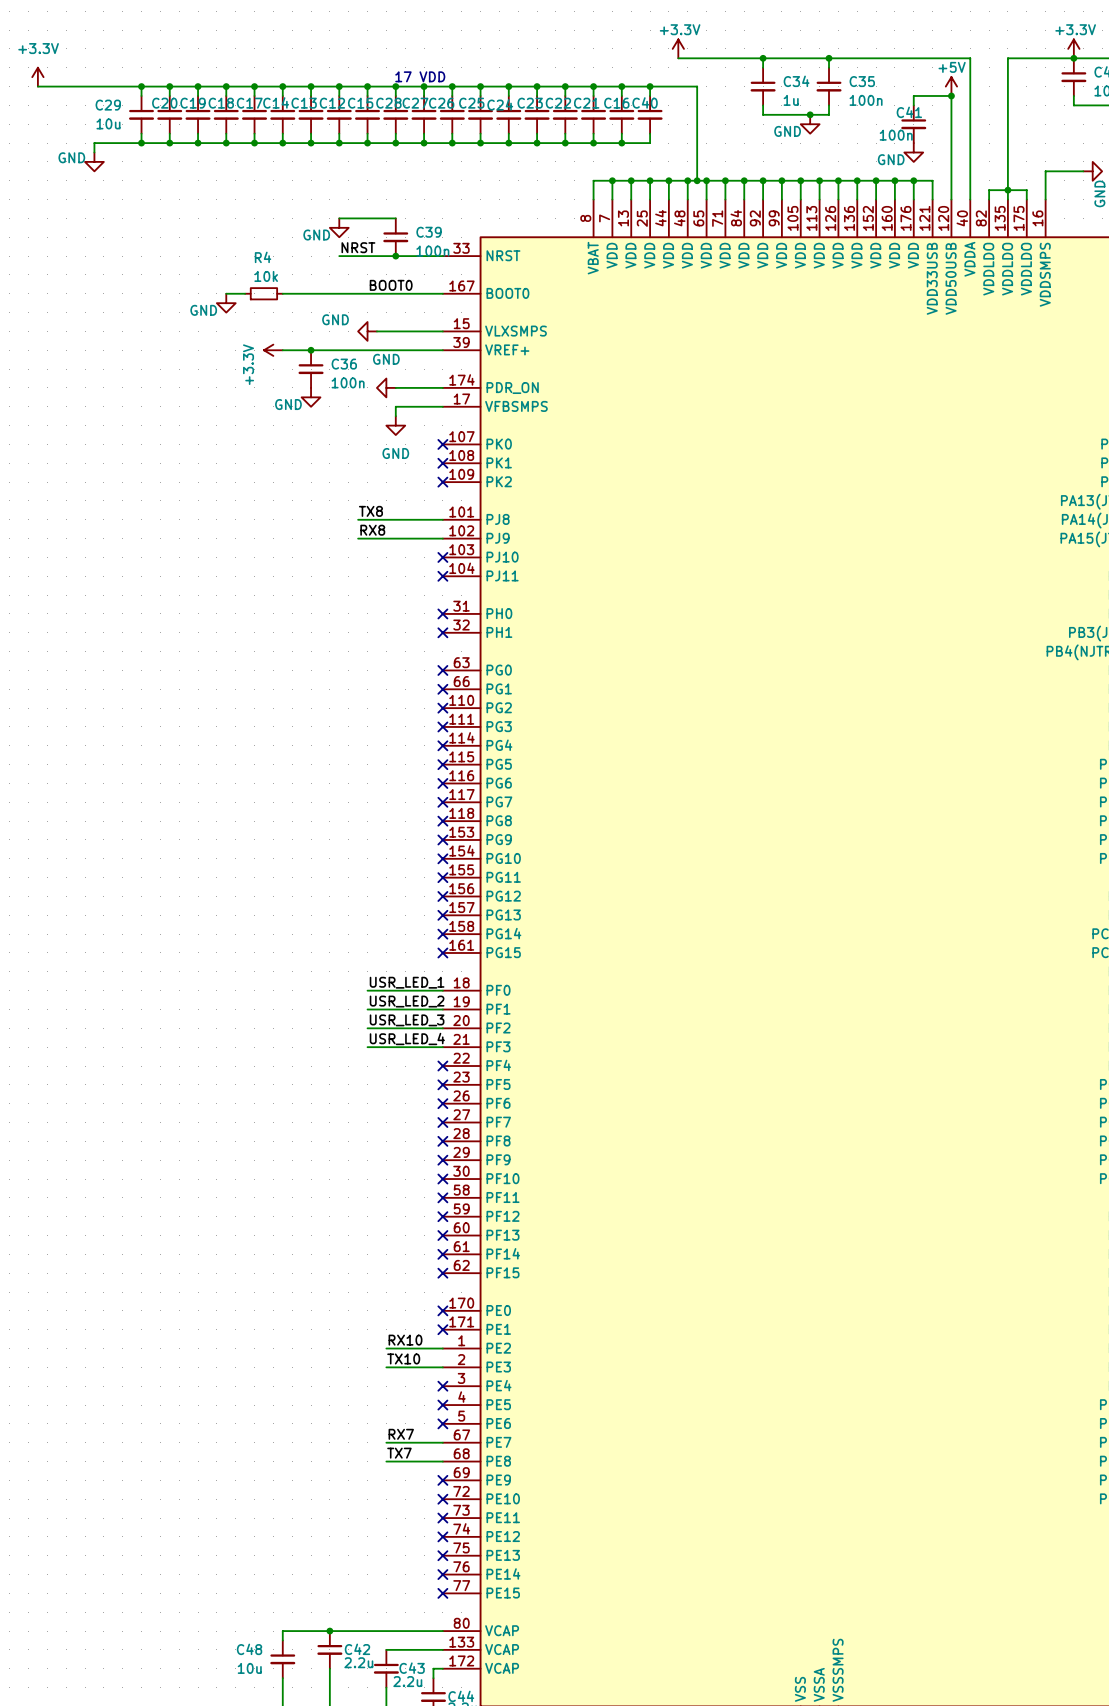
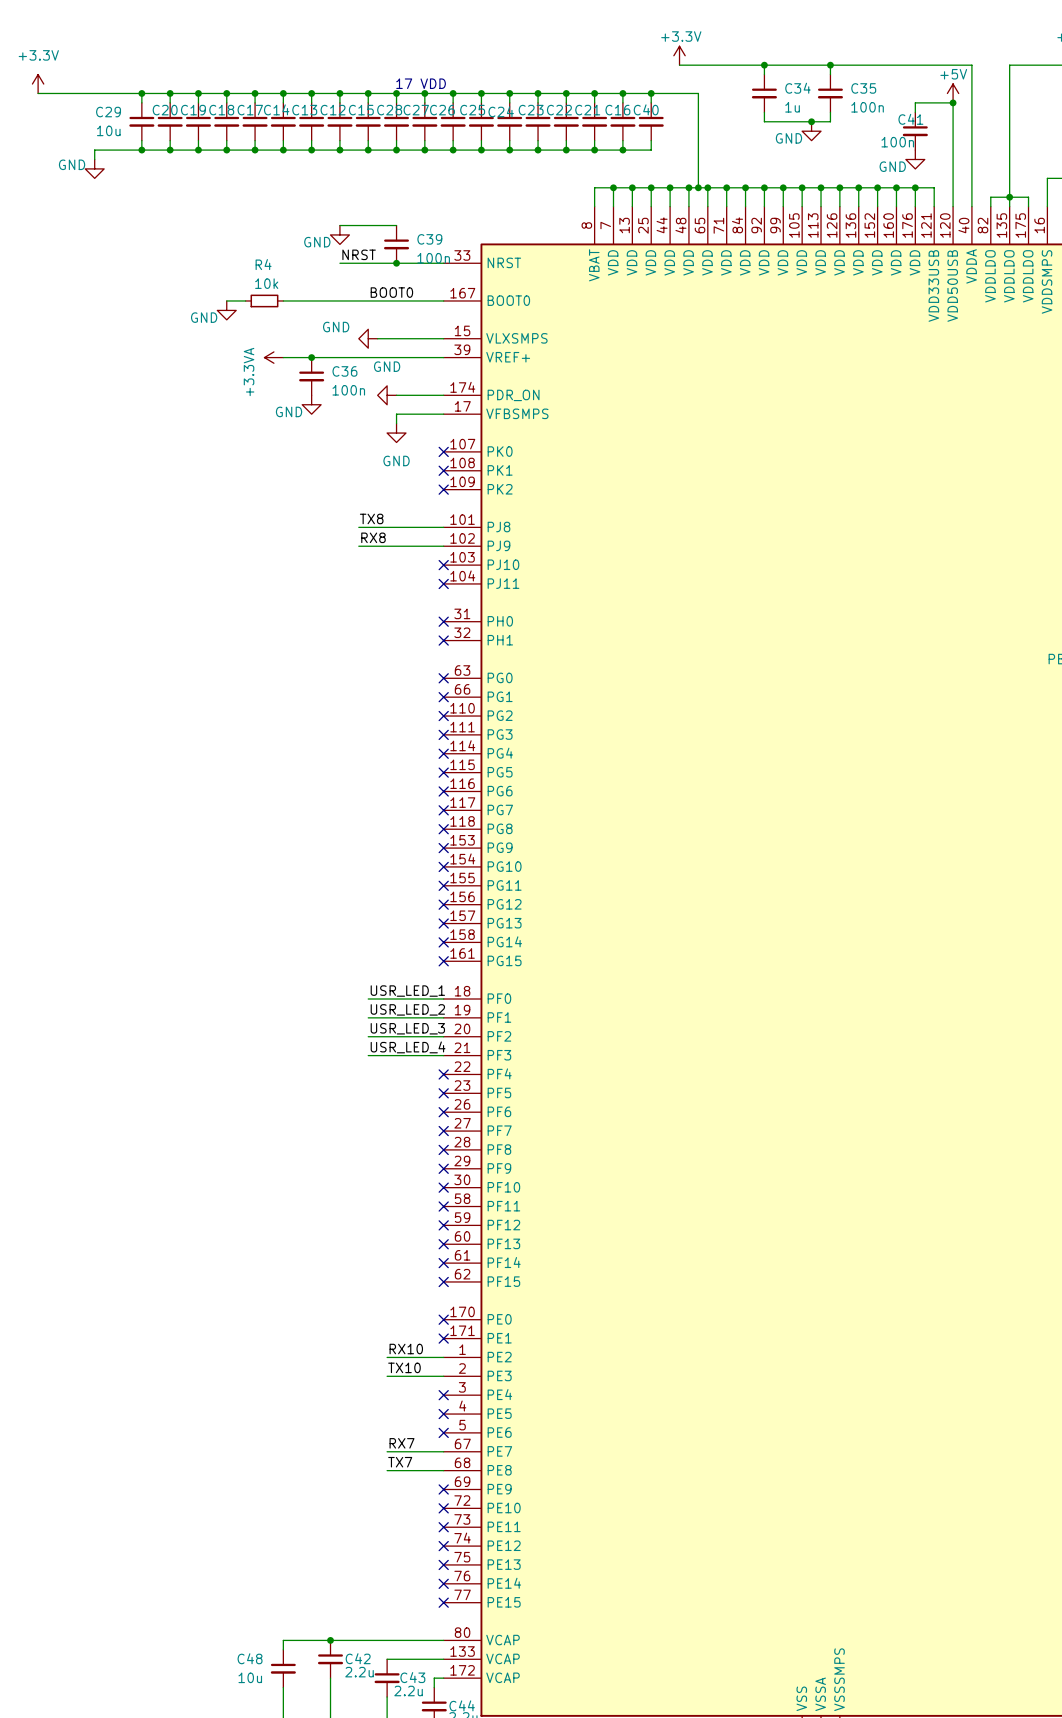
power symbol: +3.3V (273, 350) -> +3.3VA (273, 357)

